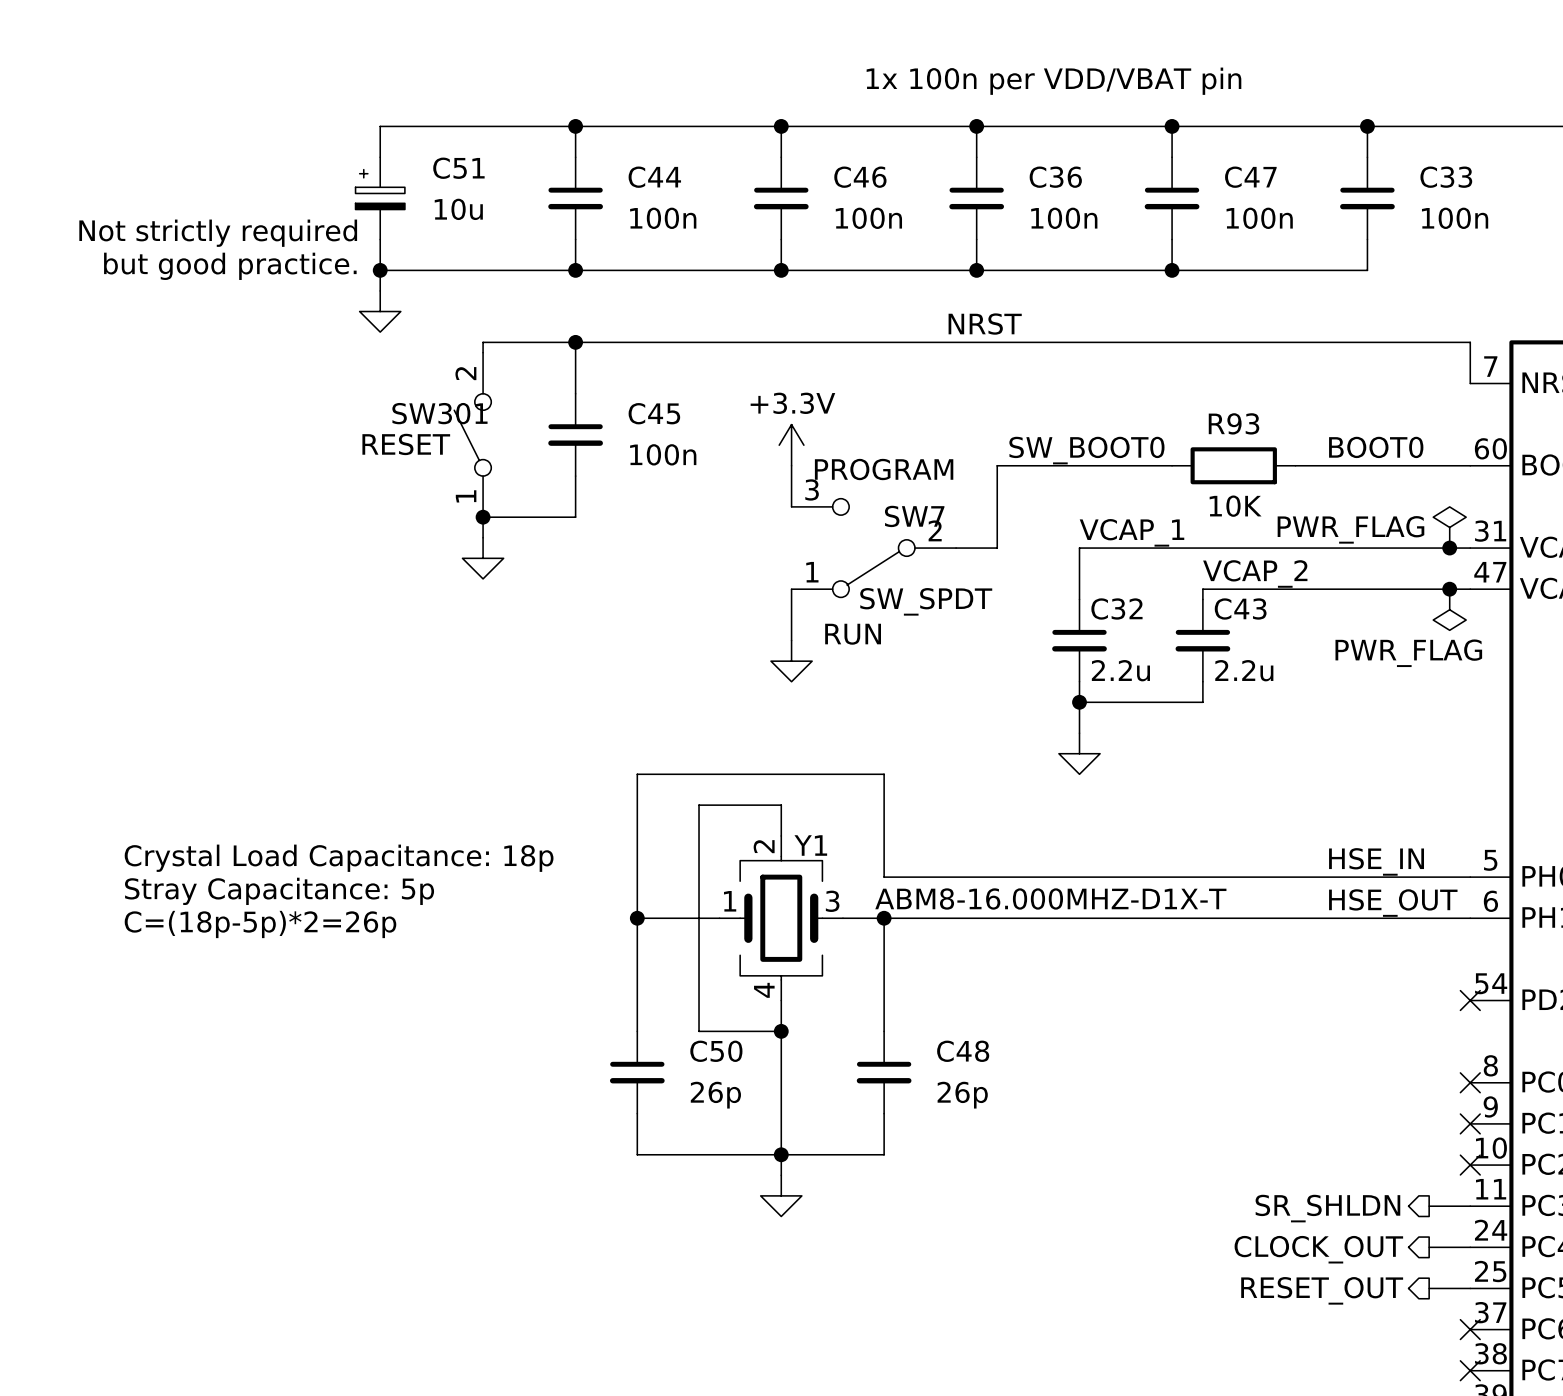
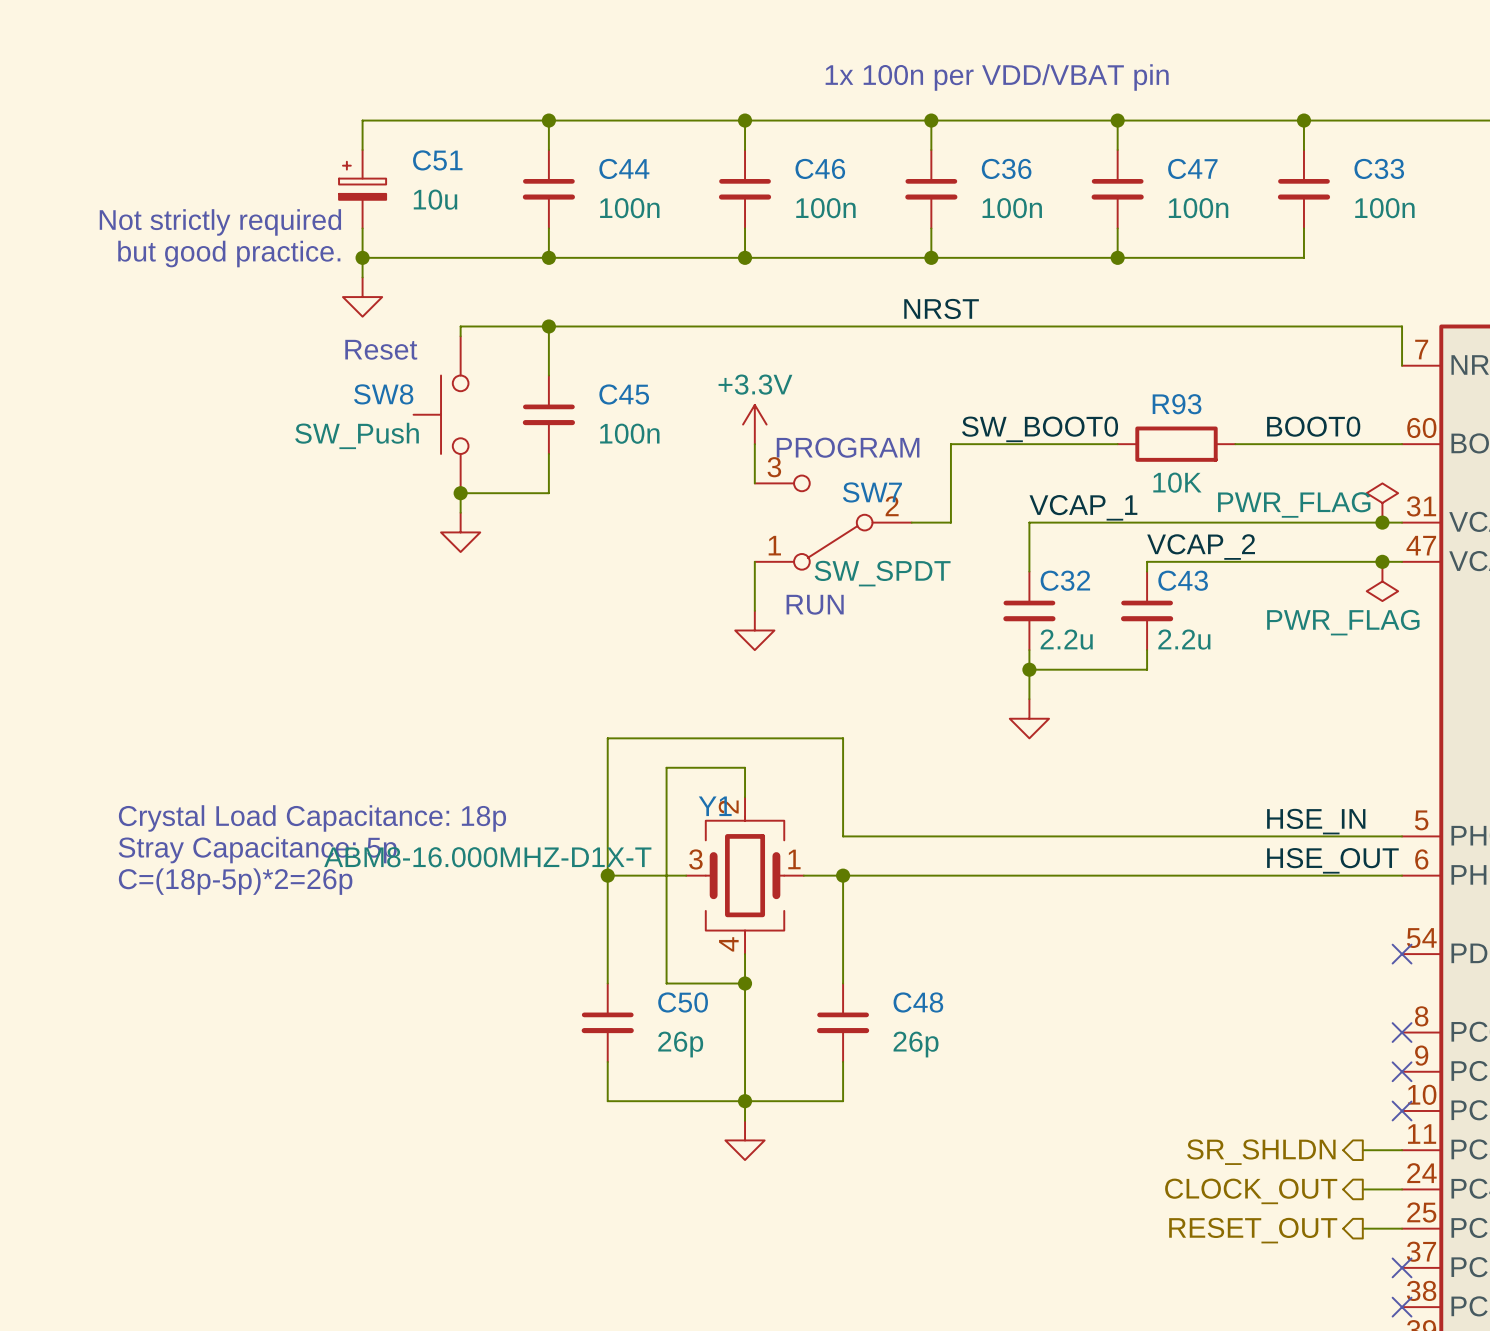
text: none -> Reset (381, 349)
SW8: none -> SW_Push (441, 414)
SW301: RESET (472, 434) -> none
Y1 flip: as is (781, 918) -> left-right (745, 875)

